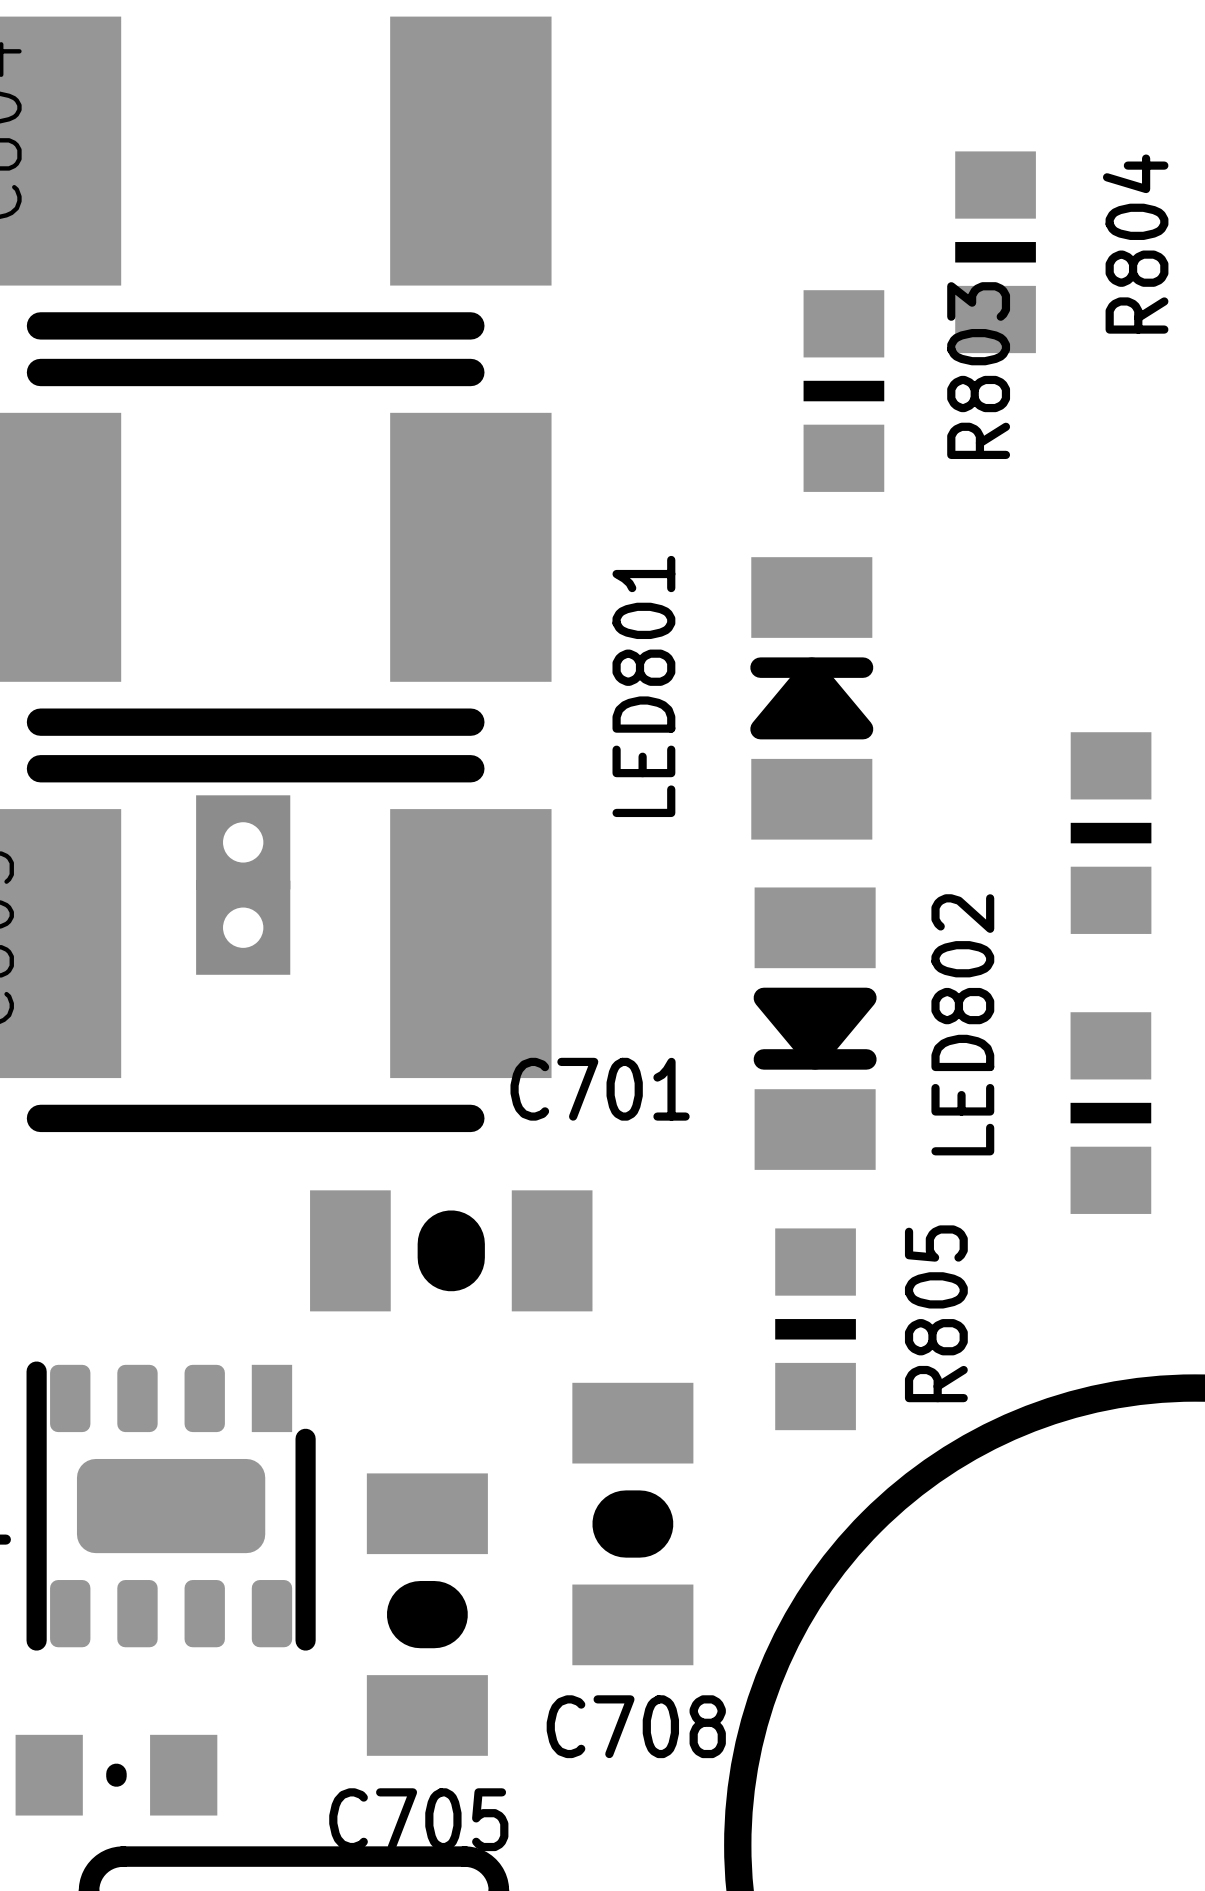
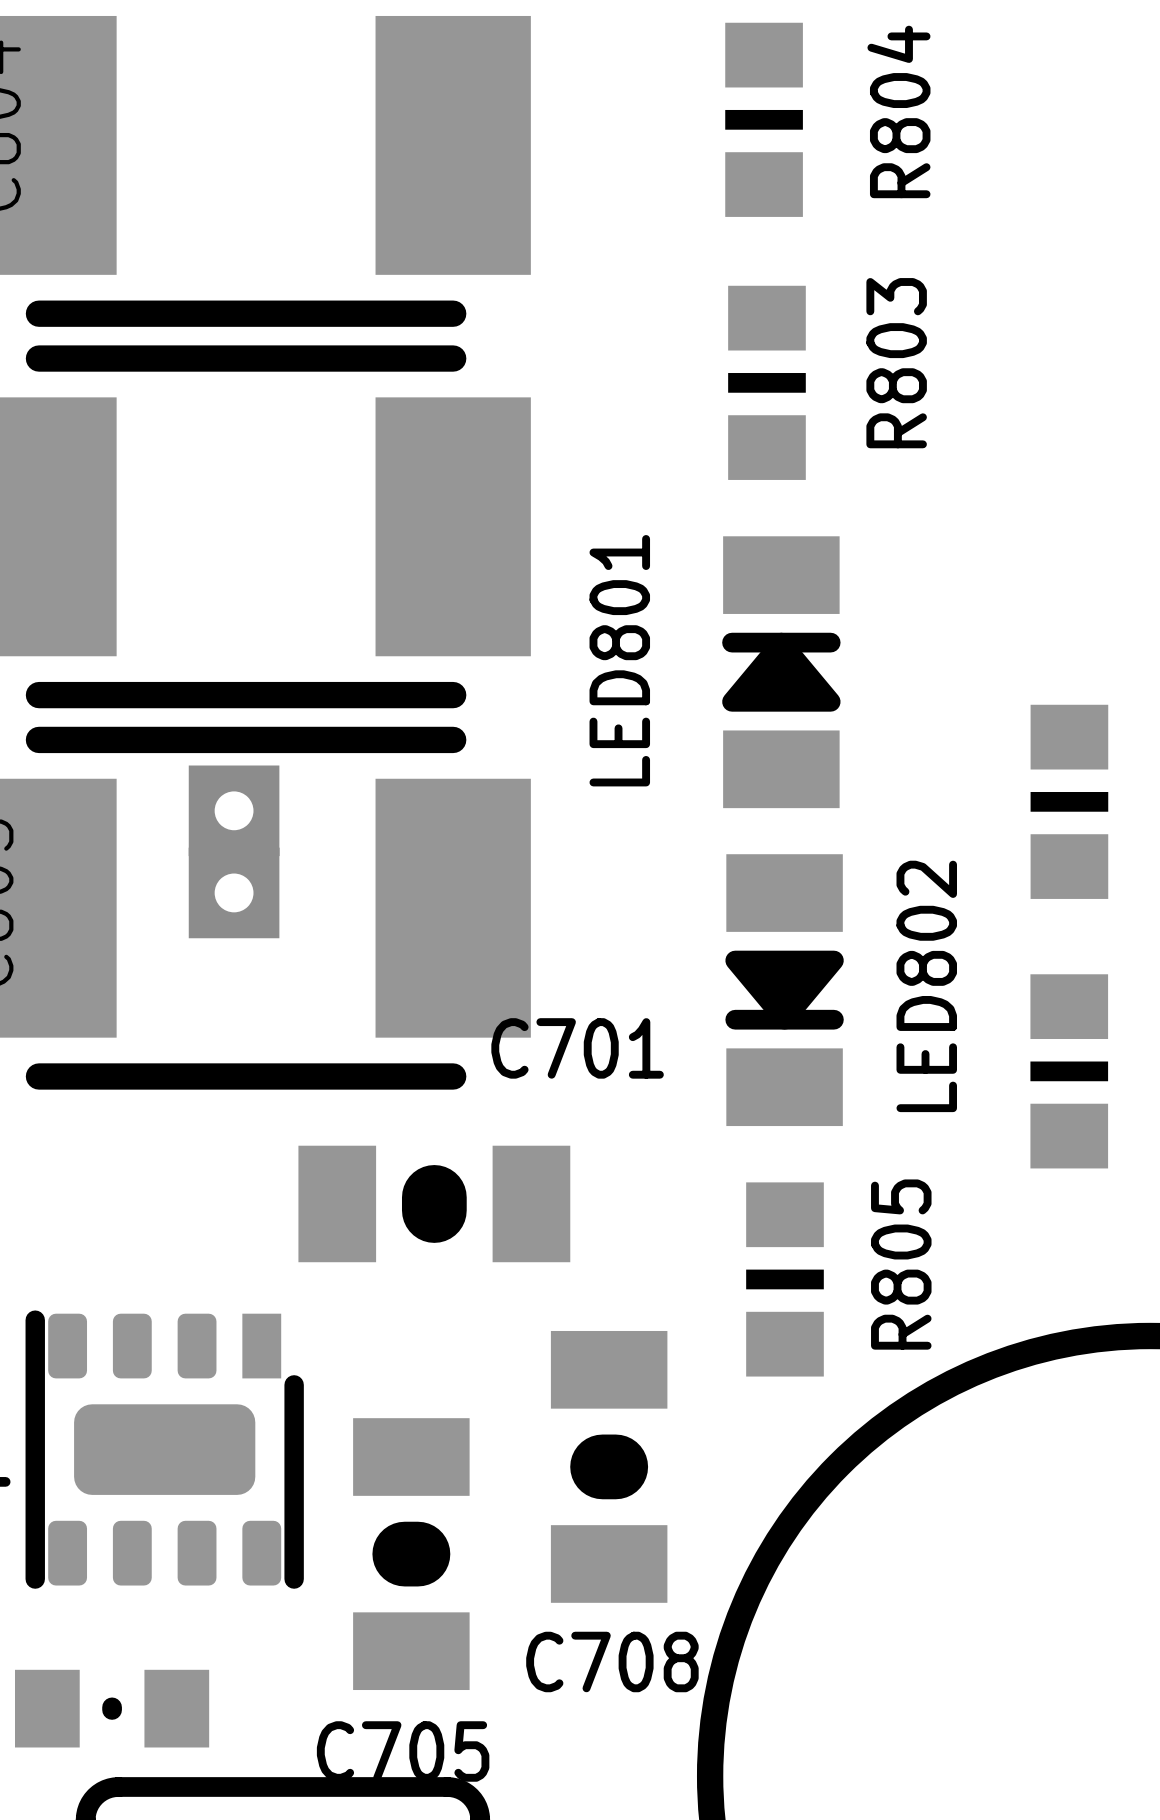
R804 position: (995, 252) -> (764, 119)
R803 position: (843, 391) -> (766, 382)

